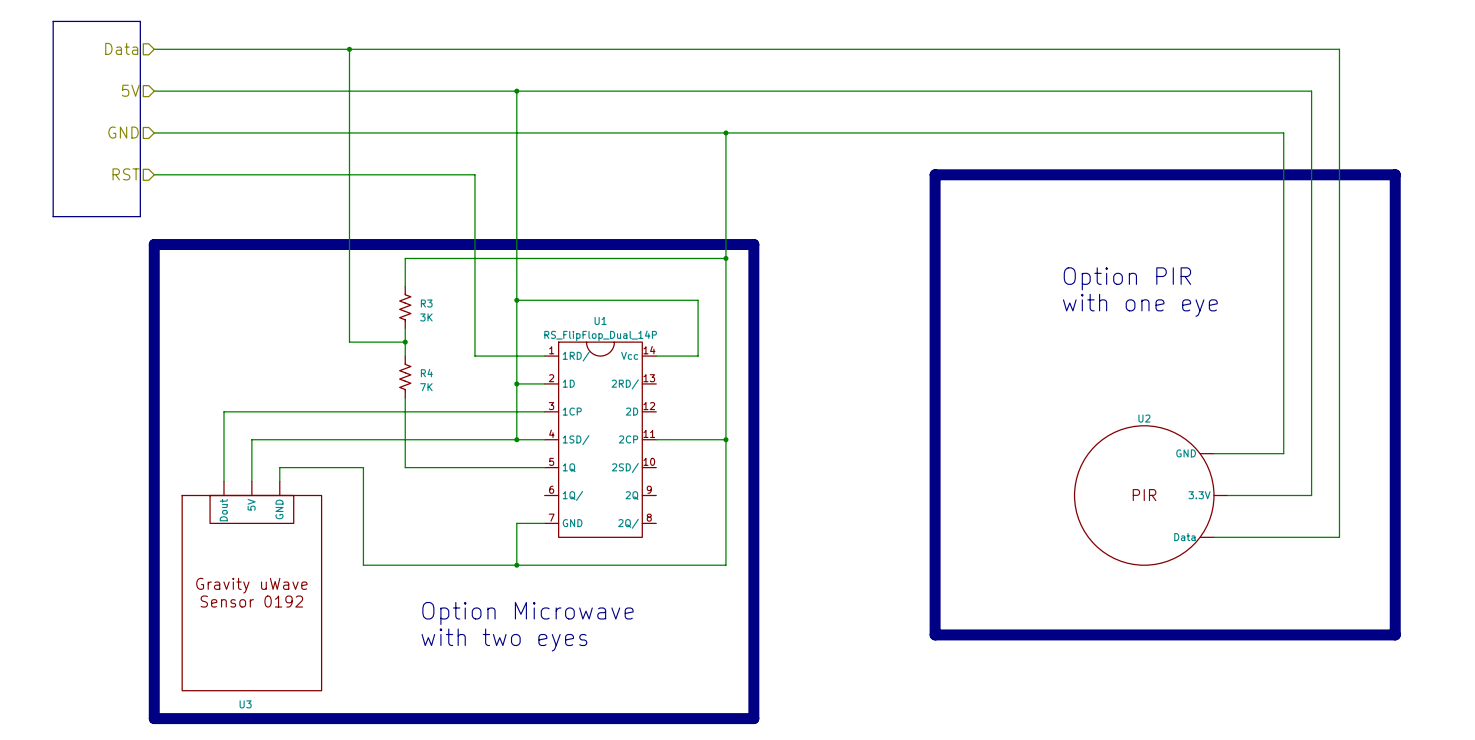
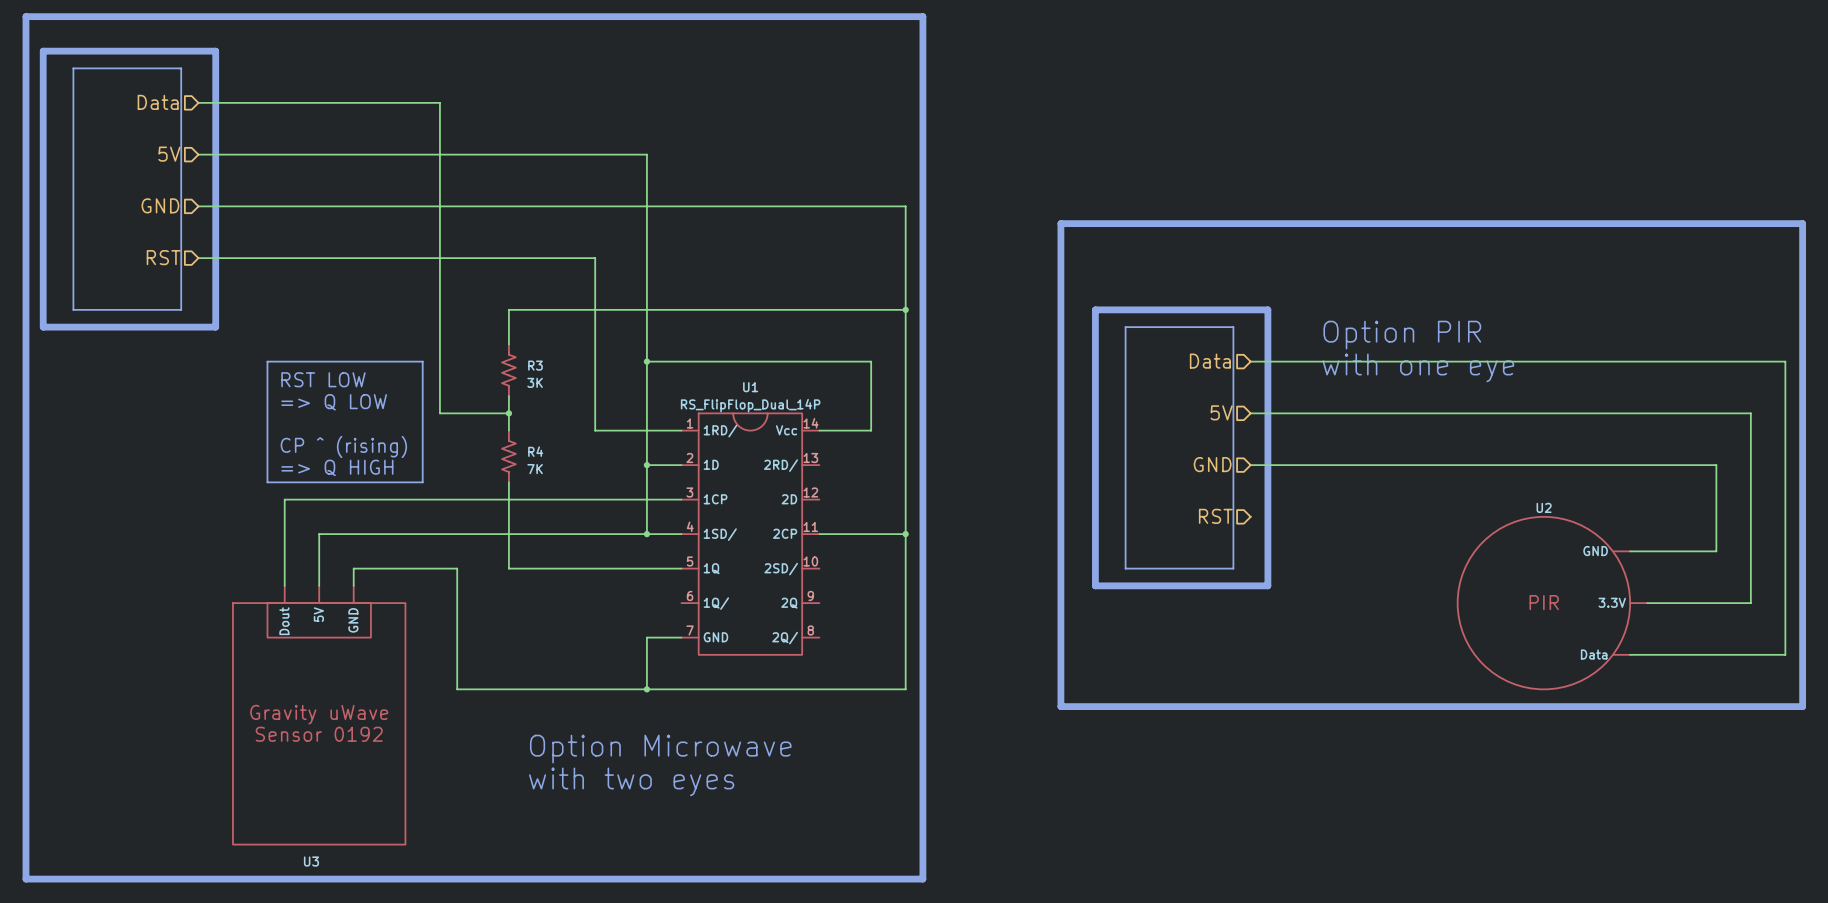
line: (53, 21) (53, 63) -> (181, 68) (73, 68)
line: none -> (73, 16) (25, 16) (25, 879) (198, 879)
line width: thin (53, 21) (140, 21) -> thick (73, 16) (181, 16)
line: (140, 21) (140, 63) -> none
hierarchical label: Data (121, 48) -> none
line: none -> (43, 51) (215, 51) (215, 327) (43, 327) (43, 51)
wire: (154, 49) (1339, 49) (1339, 537) -> (1250, 361) (1785, 361) (1785, 654) (1664, 654)
wire: (349, 49) (349, 91) (1311, 91) (1311, 495) (1227, 495) -> none
junction: (349, 49) -> none
hierarchical label: 5V (130, 90) -> Data (158, 102)
wire: (516, 91) (516, 132) (1283, 132) (1283, 453) (1213, 453) -> none
junction: (516, 91) -> none
hierarchical label: GND (123, 132) -> 5V (169, 154)
wire: (725, 132) (725, 174) -> (595, 206) (905, 206)
junction: (725, 132) -> none
hierarchical label: RST (126, 174) -> GND (160, 205)
wire: (474, 174) (474, 216) -> (198, 258) (595, 258)
line: (935, 174) (1395, 174) (1395, 634) (935, 634) (935, 174) -> (1060, 223) (1060, 706) (1802, 706) (1802, 223) (1060, 223)
line: (53, 216) (140, 216) -> (73, 258) (73, 309) (181, 309) (181, 258)
hierarchical label: none -> RST (163, 257)
line: none -> (1095, 309) (1267, 309) (1267, 585) (1095, 585) (1095, 309)
line: none -> (1125, 327) (1233, 327) (1233, 568) (1125, 568) (1125, 327)
hierarchical label: none -> Data (1210, 361)
line: none -> (267, 361) (422, 361) (422, 482) (267, 482) (267, 361)
text: none -> RST LOW (323, 379)
text: none -> => Q LOW (334, 402)
hierarchical label: none -> 5V (1221, 412)
wire: none -> (1250, 413) (1750, 413) (1750, 603) (1647, 603)
text: none -> CP ^ (rising) (343, 446)
hierarchical label: none -> GND (1212, 464)
wire: none -> (1250, 465) (1716, 465) (1716, 551) (1630, 551)
text: none -> => Q HIGH (337, 467)
hierarchical label: none -> RST (1215, 516)
U2 position: (1151, 495) -> (1552, 603)
wire: (1213, 537) (1311, 537) -> none
line: (154, 718) (154, 244) (753, 244) (753, 718) (739, 718) -> (181, 16) (922, 16) (922, 879)
line width: thick (154, 718) (739, 718) -> thin (198, 879) (922, 879)

